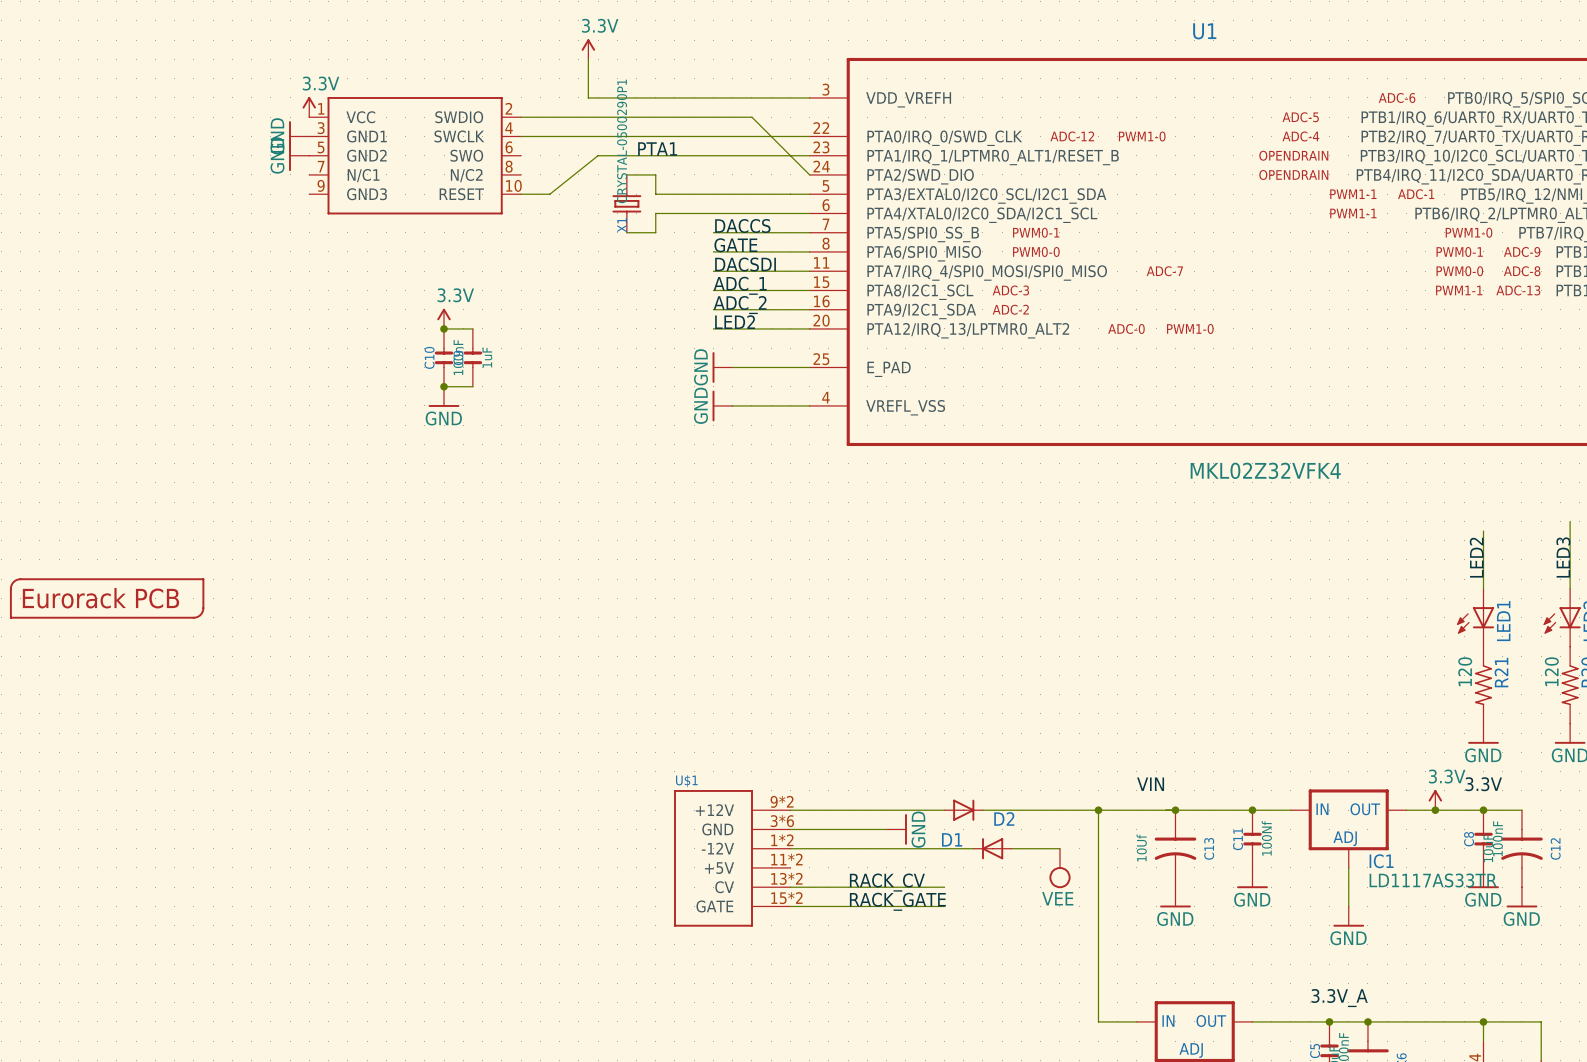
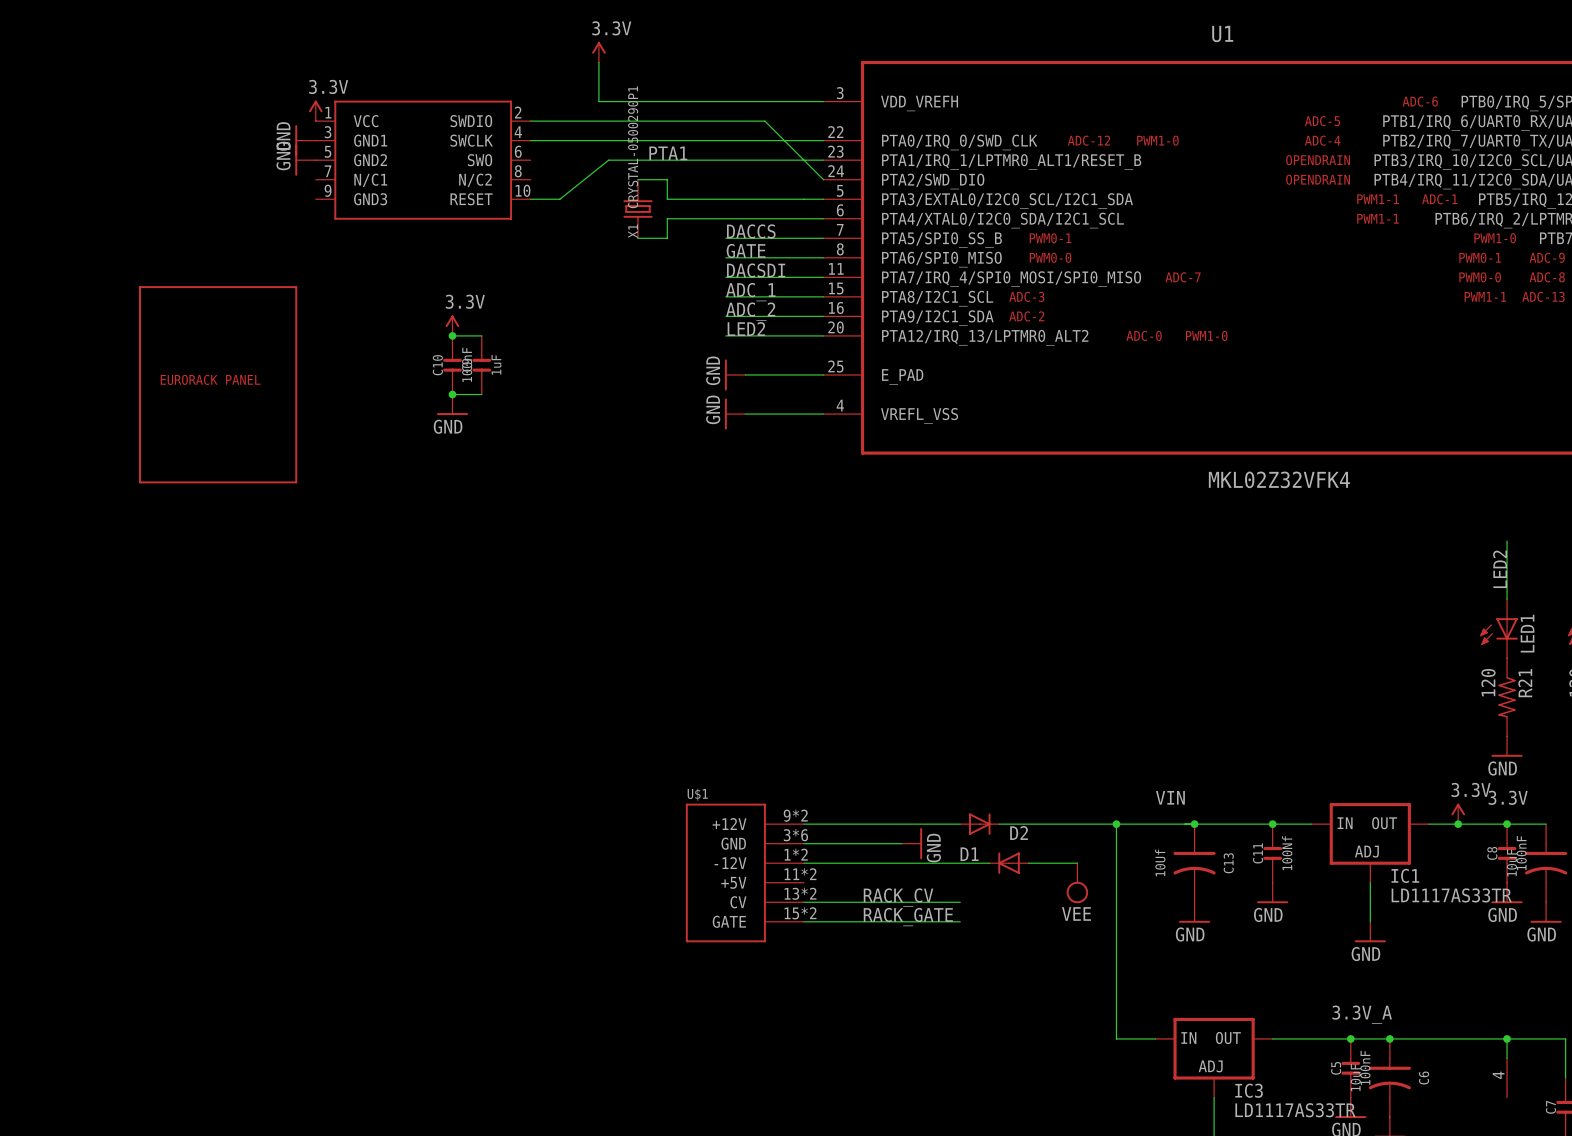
part: none -> (218, 384)
part: (107, 598) -> none

